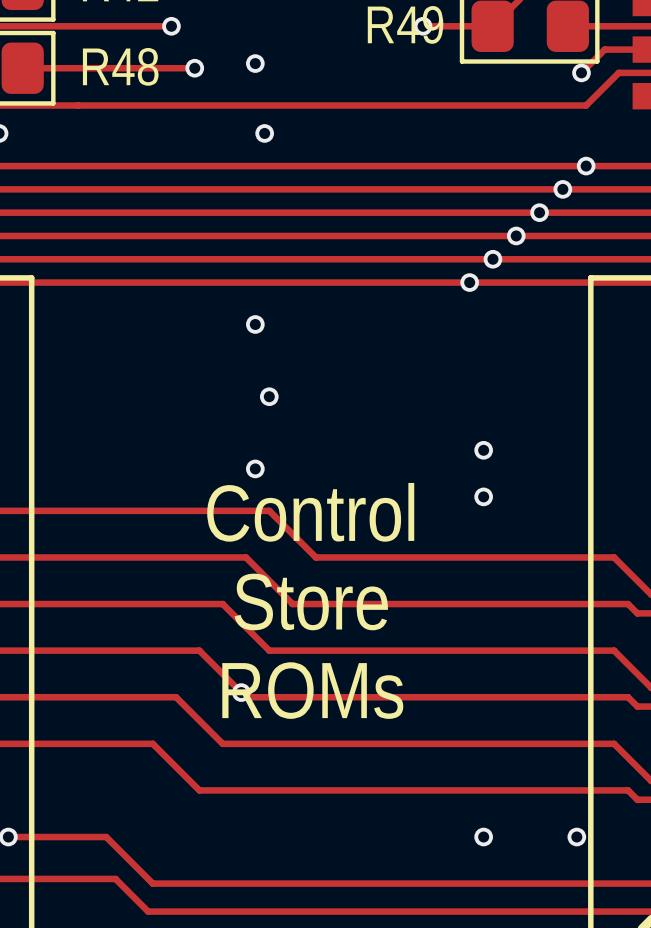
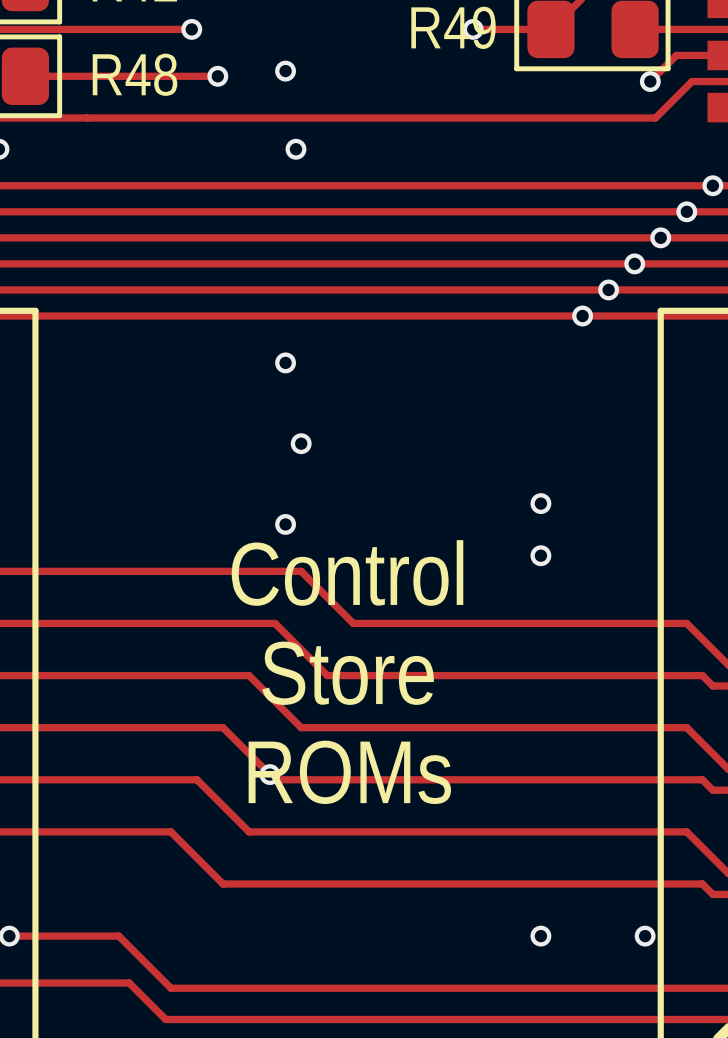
via: (586, 166) -> none
via: none -> (712, 185)
via: (562, 189) -> none
via: none -> (686, 211)
via: (539, 212) -> none
via: none -> (660, 237)
via: (516, 235) -> none
via: none -> (634, 263)
via: (492, 259) -> none
via: none -> (608, 289)
via: (469, 282) -> none
via: none -> (582, 316)

